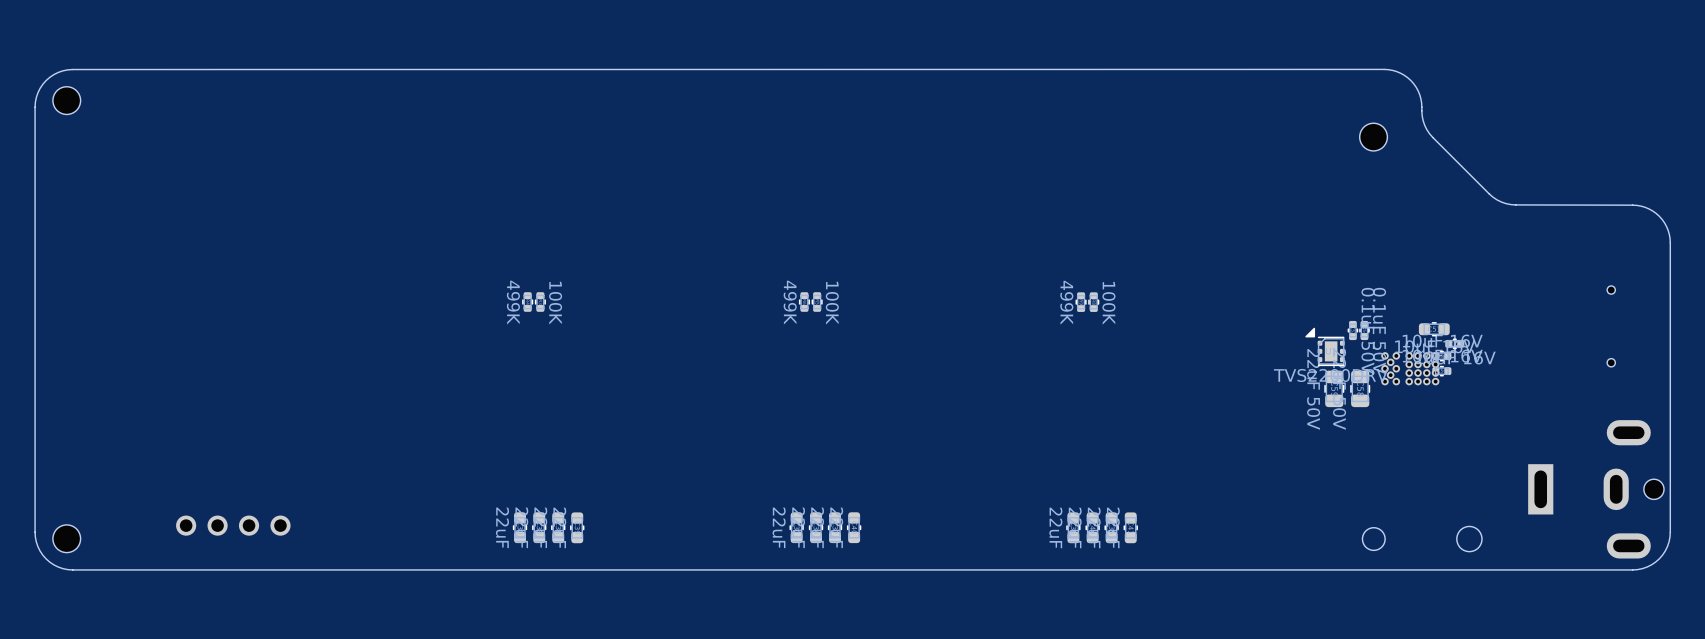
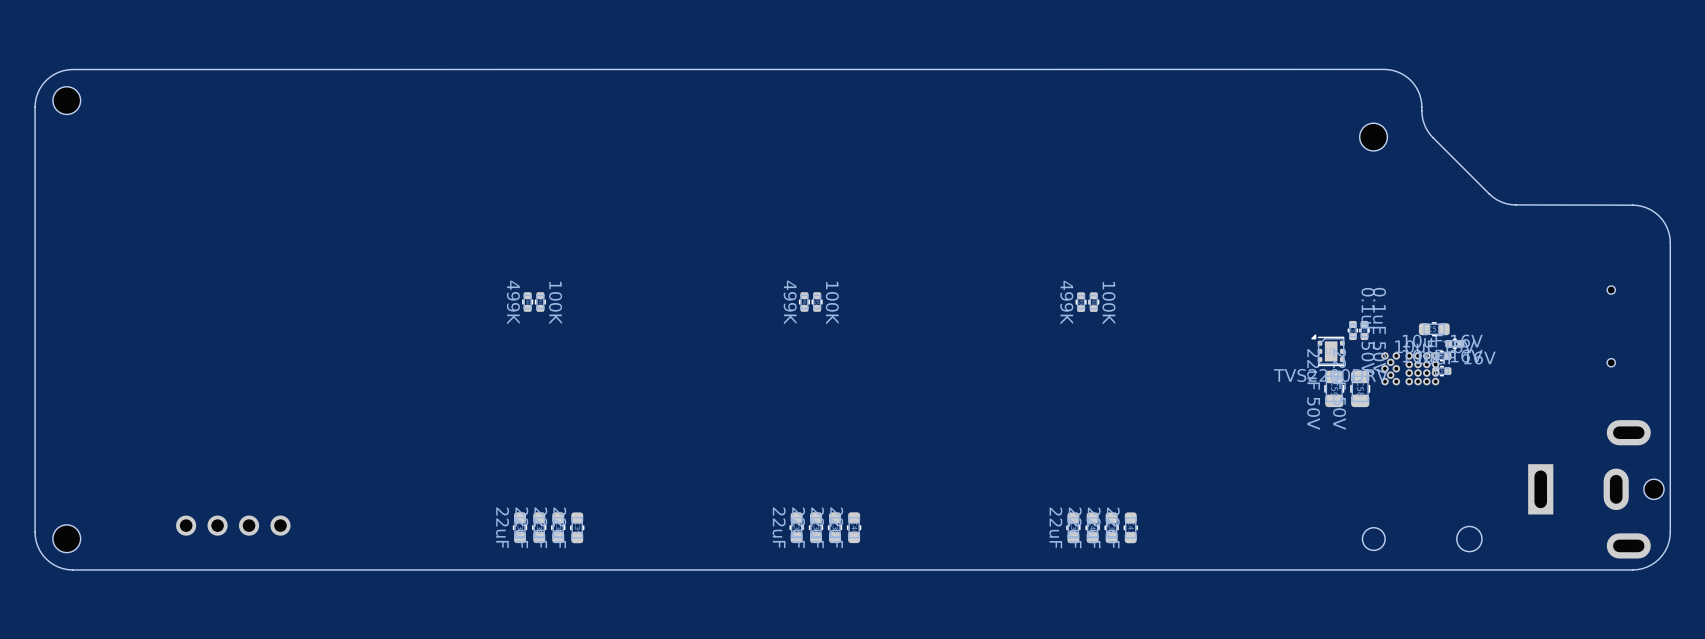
part footprint: [1305, 327, 1345, 367] -> [1311, 334, 1345, 367]

